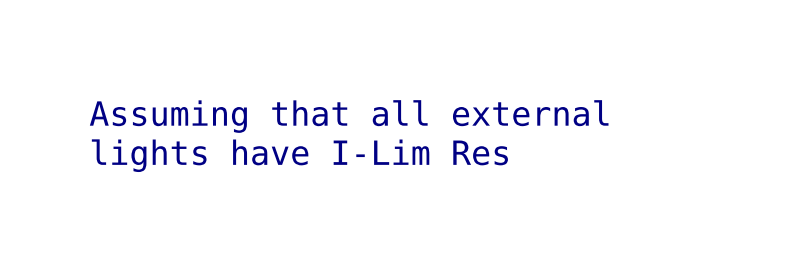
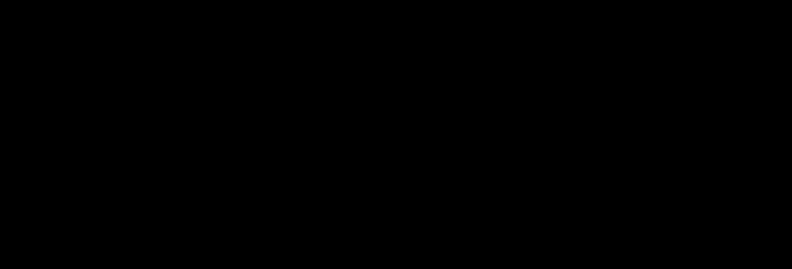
text: Assuming that all external (349, 116) -> none
text: lights have I-Lim Res (299, 155) -> none

